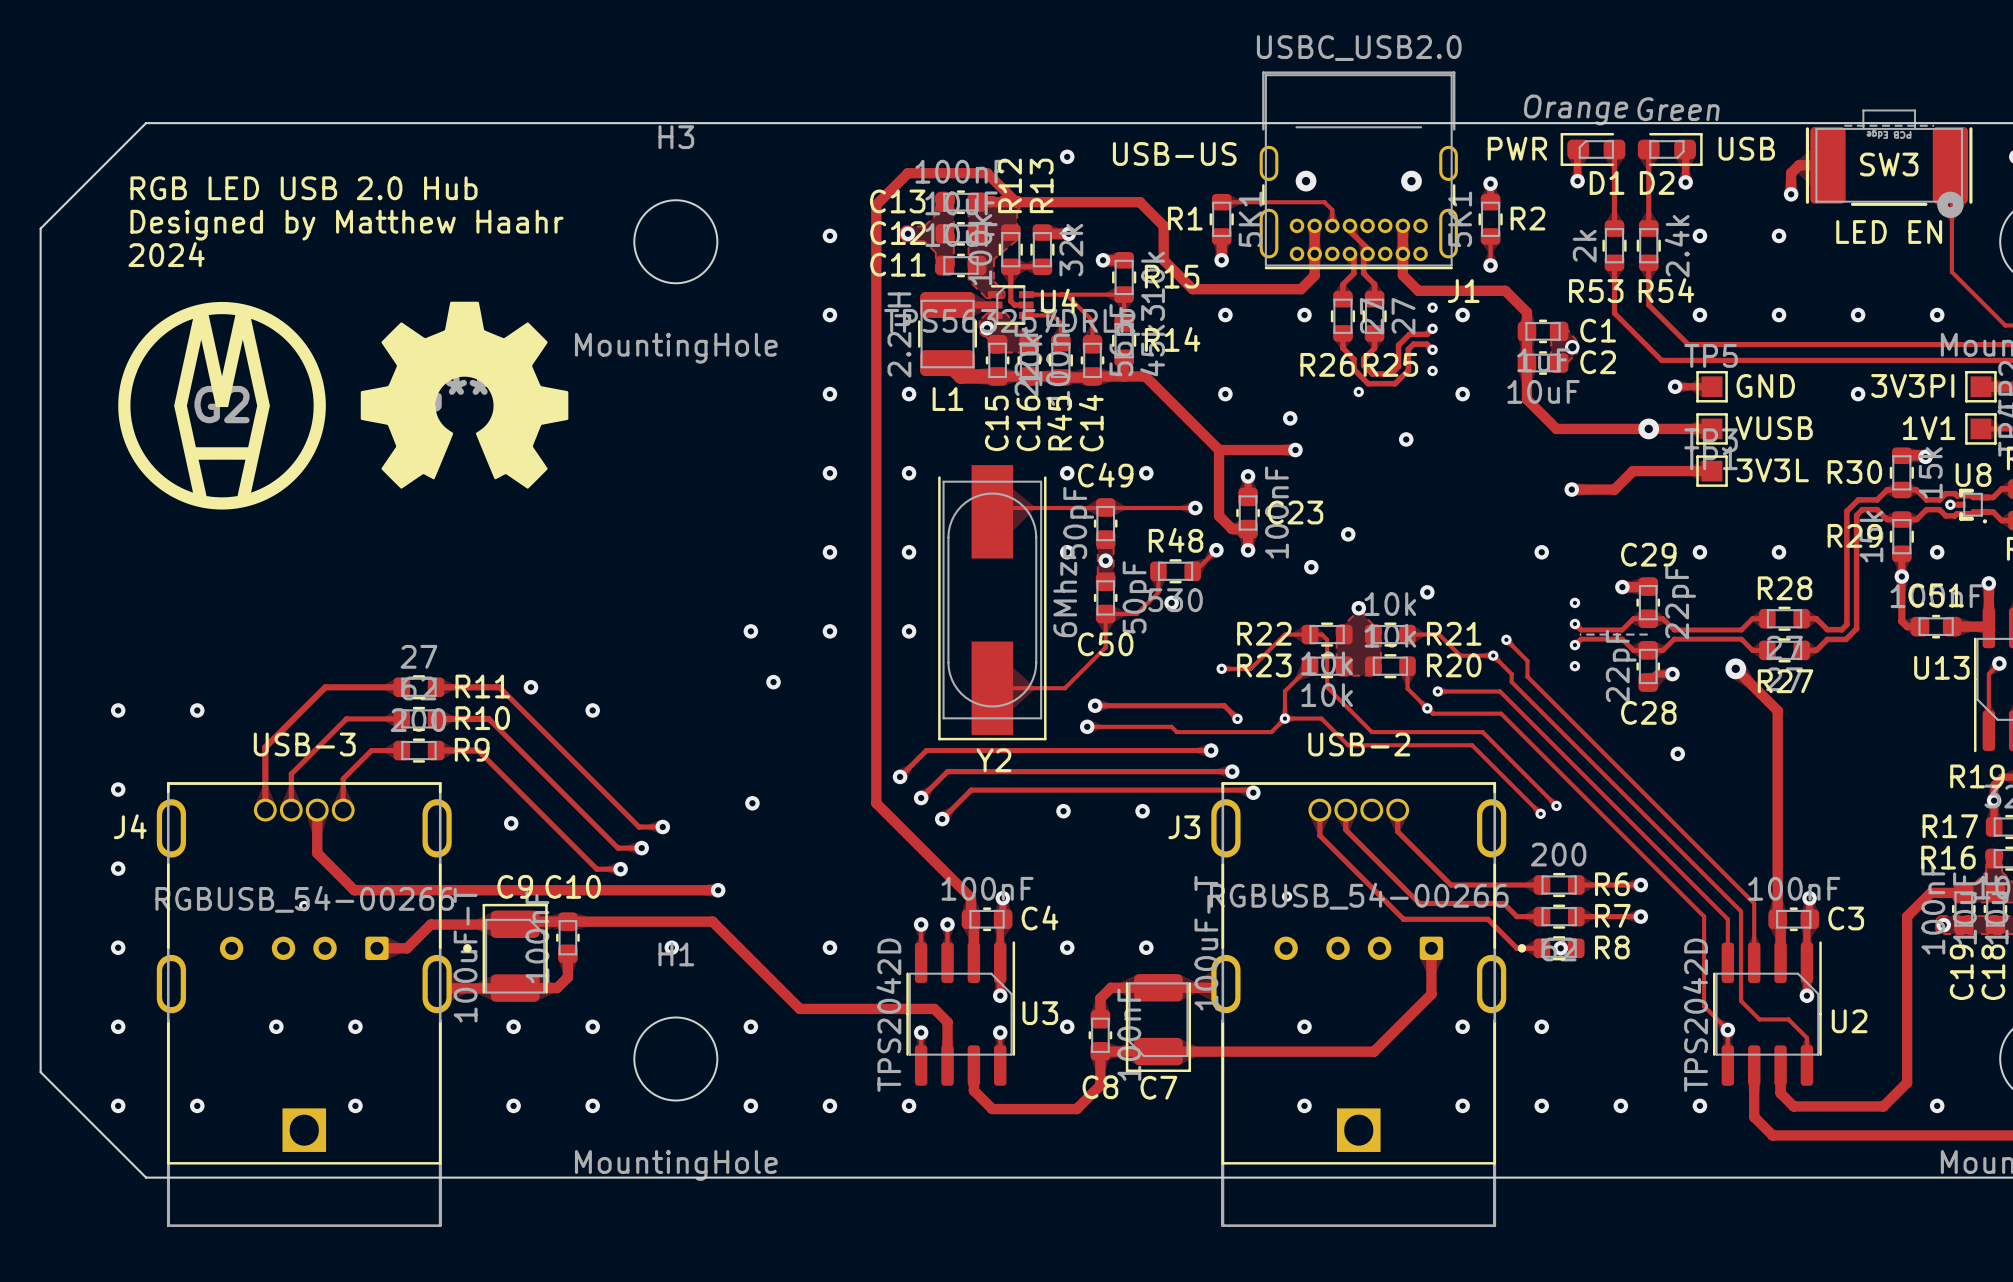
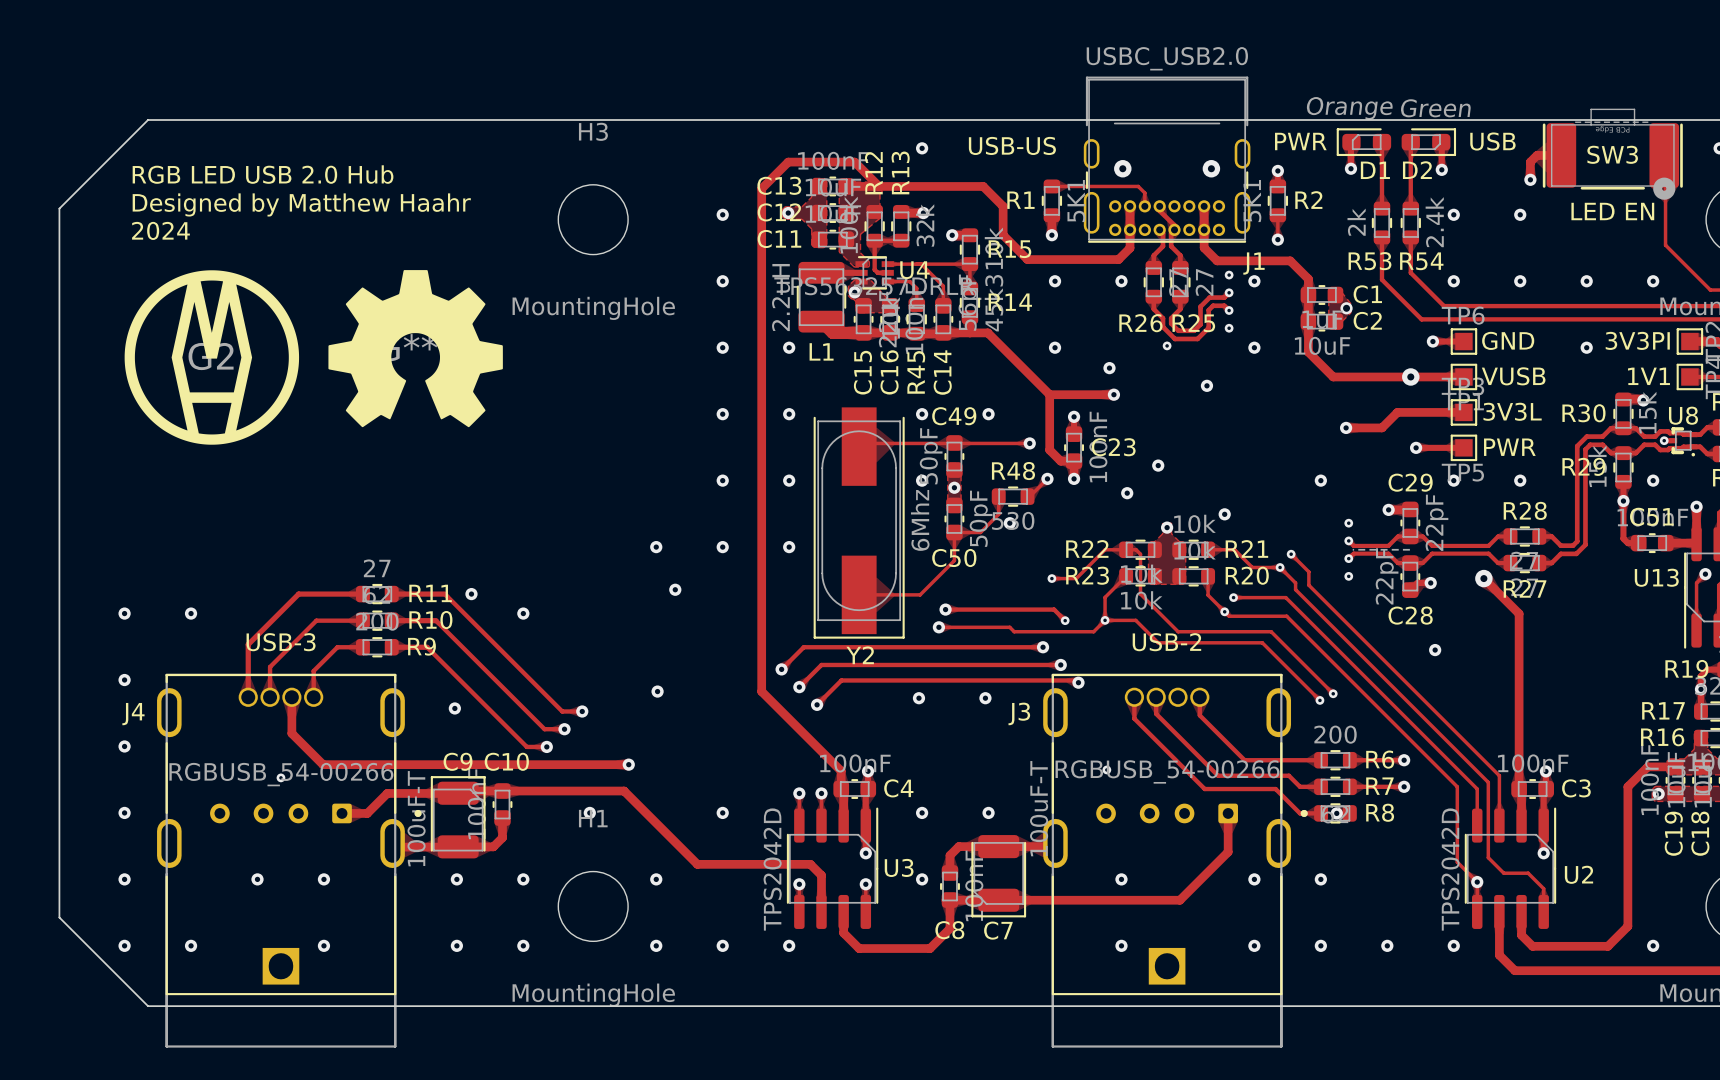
TP5 name: TP5 (1711, 355) -> TP6 (1463, 315)
track: none -> (1416, 447) (1463, 447)
via: none -> (1416, 447)
TP5: none -> PWR (1463, 447)

